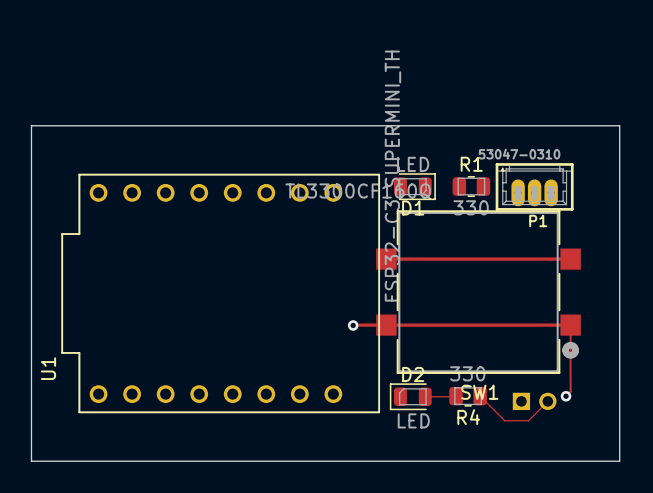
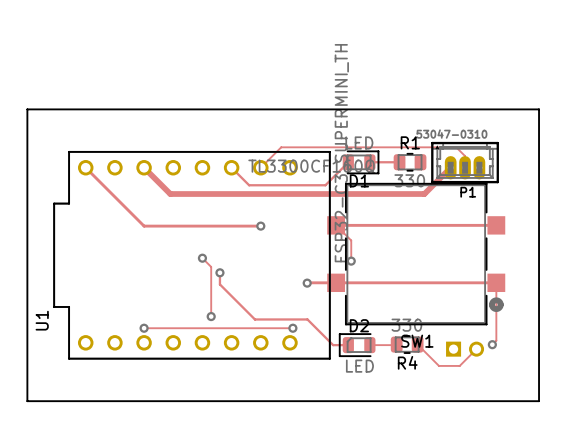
track: none -> (348, 162) (325, 185) (249, 185) (231, 167)
track: none -> (369, 162) (399, 162)
track: none -> (85, 167) (144, 226) (260, 226)
track: none -> (144, 167) (170, 194) (424, 194) (450, 167)
track: none -> (260, 167) (281, 147) (456, 147) (465, 156) (465, 167)
via: none -> (260, 226)
track: none -> (336, 225) (351, 240) (351, 261)
track: none -> (202, 258) (211, 266) (211, 316)
via: none -> (202, 258)
via: none -> (351, 261)
track: none -> (219, 272) (219, 284) (254, 319) (307, 319) (333, 345) (348, 345)
via: none -> (219, 272)
via: none -> (211, 316)
track: none -> (144, 328) (292, 328)
via: none -> (144, 328)
via: none -> (292, 328)

